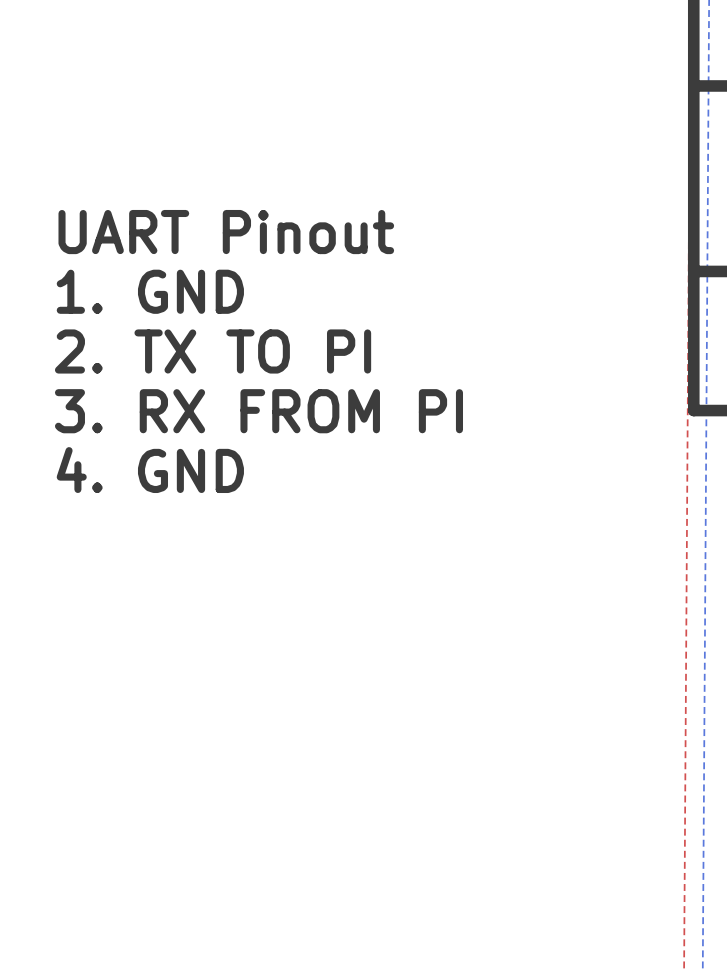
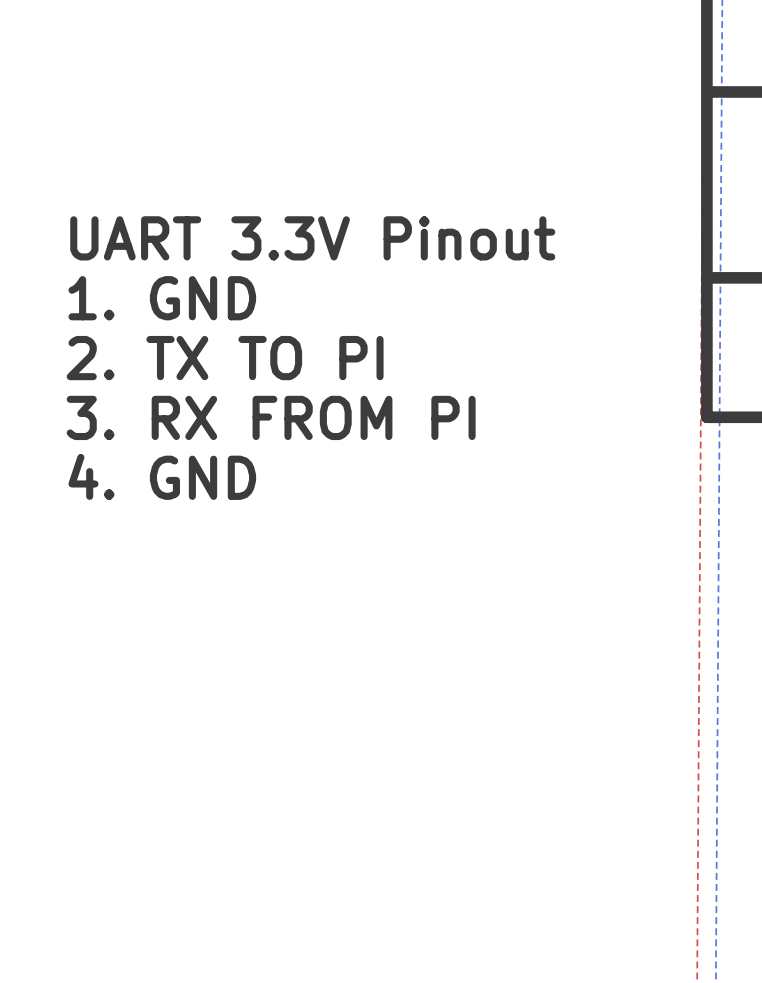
text: UART Pinout (226, 232) -> UART 3.3V Pinout (312, 238)

